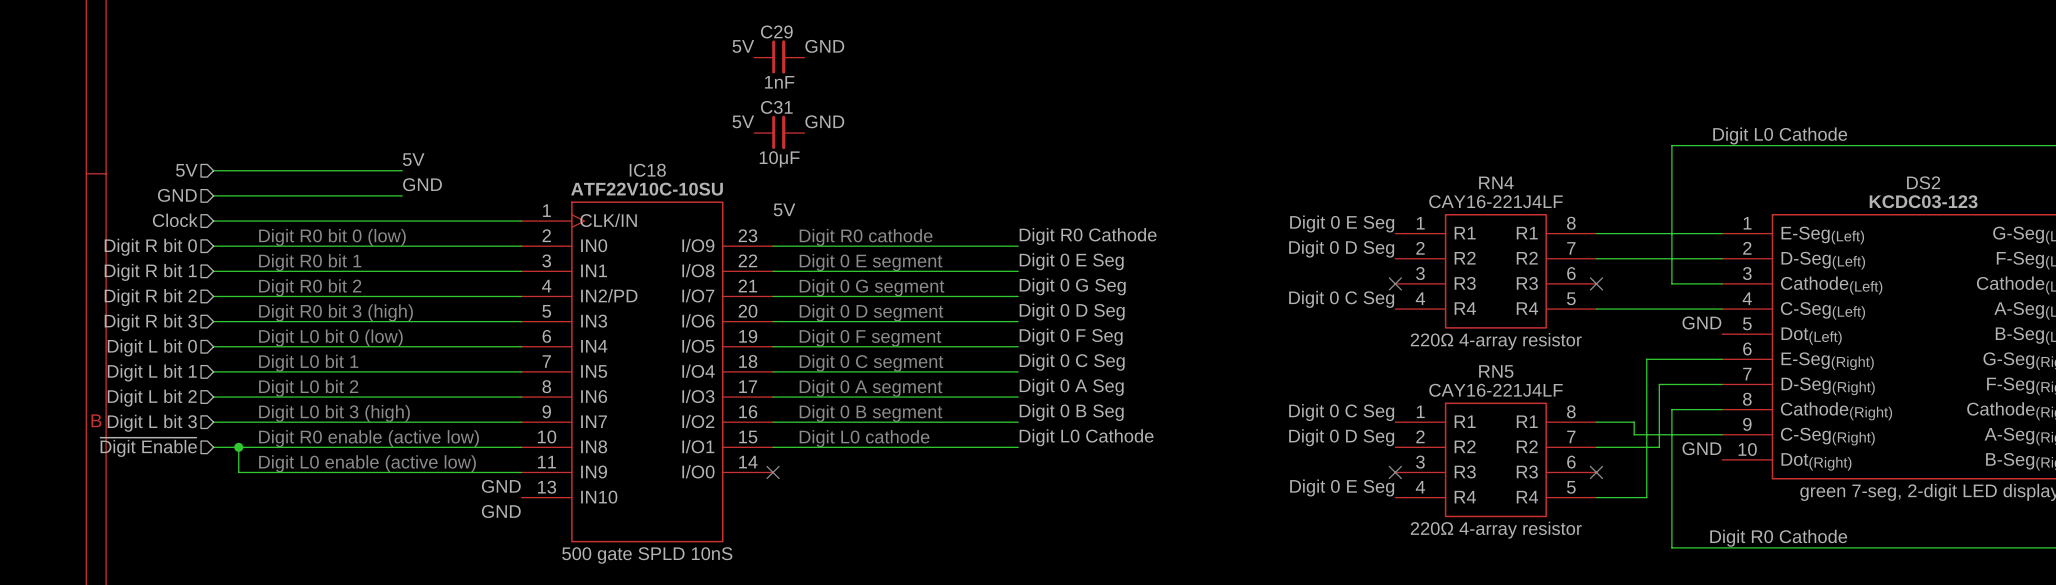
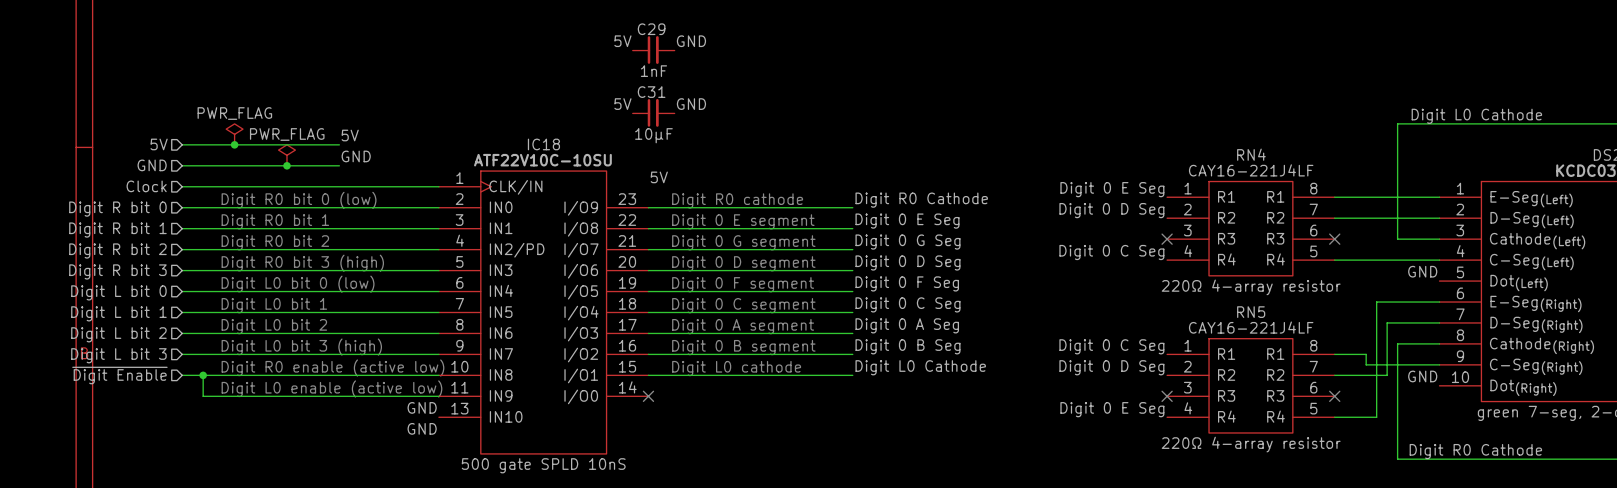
power symbol: none -> PWR_FLAG (234, 134)
junction: none -> (234, 144)
power symbol: none -> PWR_FLAG (286, 155)
junction: none -> (286, 165)

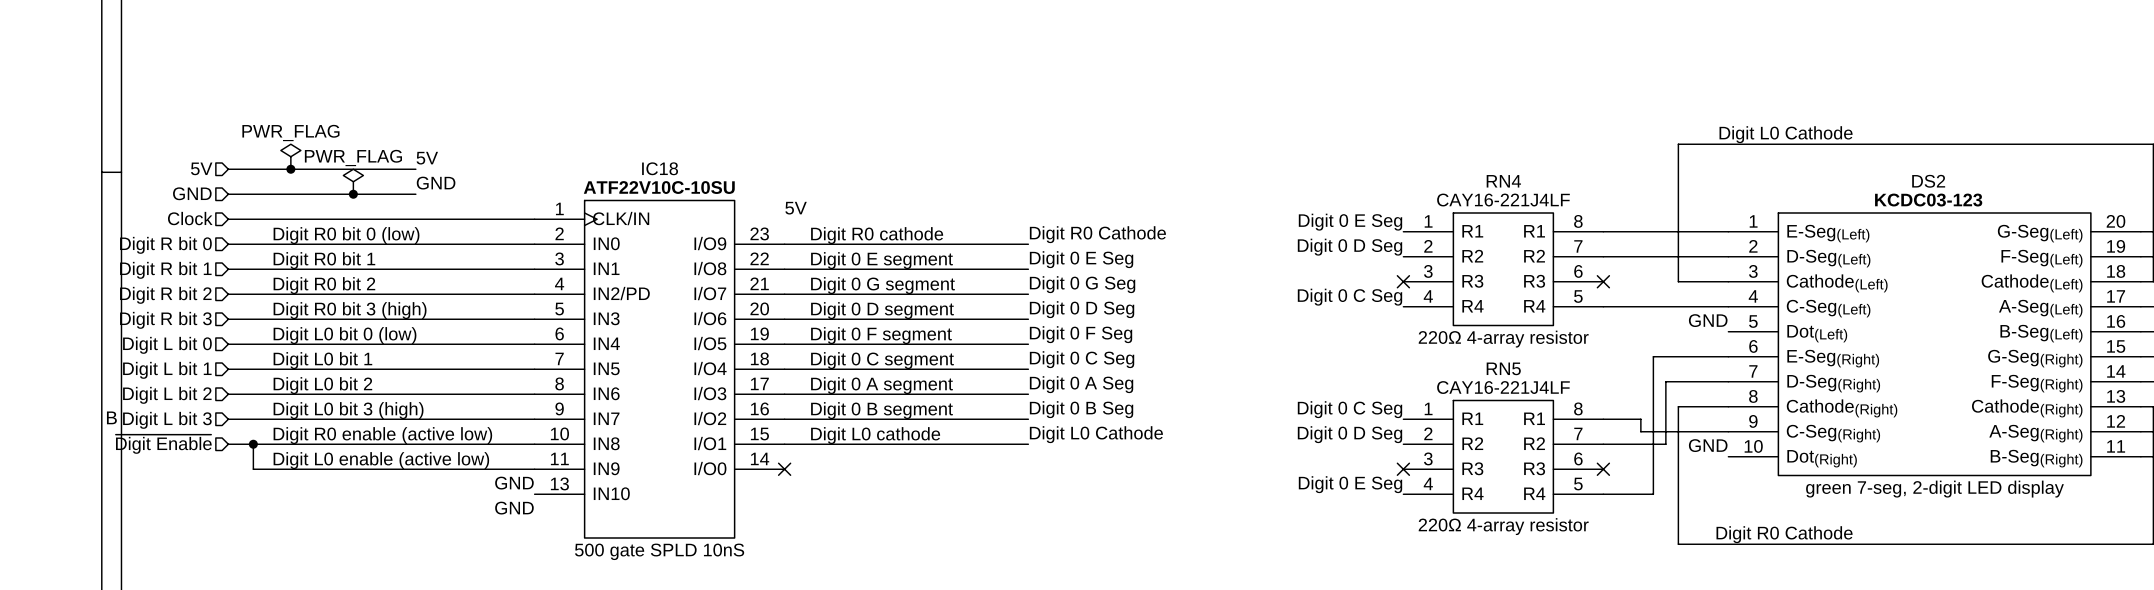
label: 5V (622, 41) -> none
label: GND (691, 41) -> none
C29: (653, 50) -> none
label: 5V (622, 104) -> none
label: GND (691, 104) -> none
C31: (653, 112) -> none

